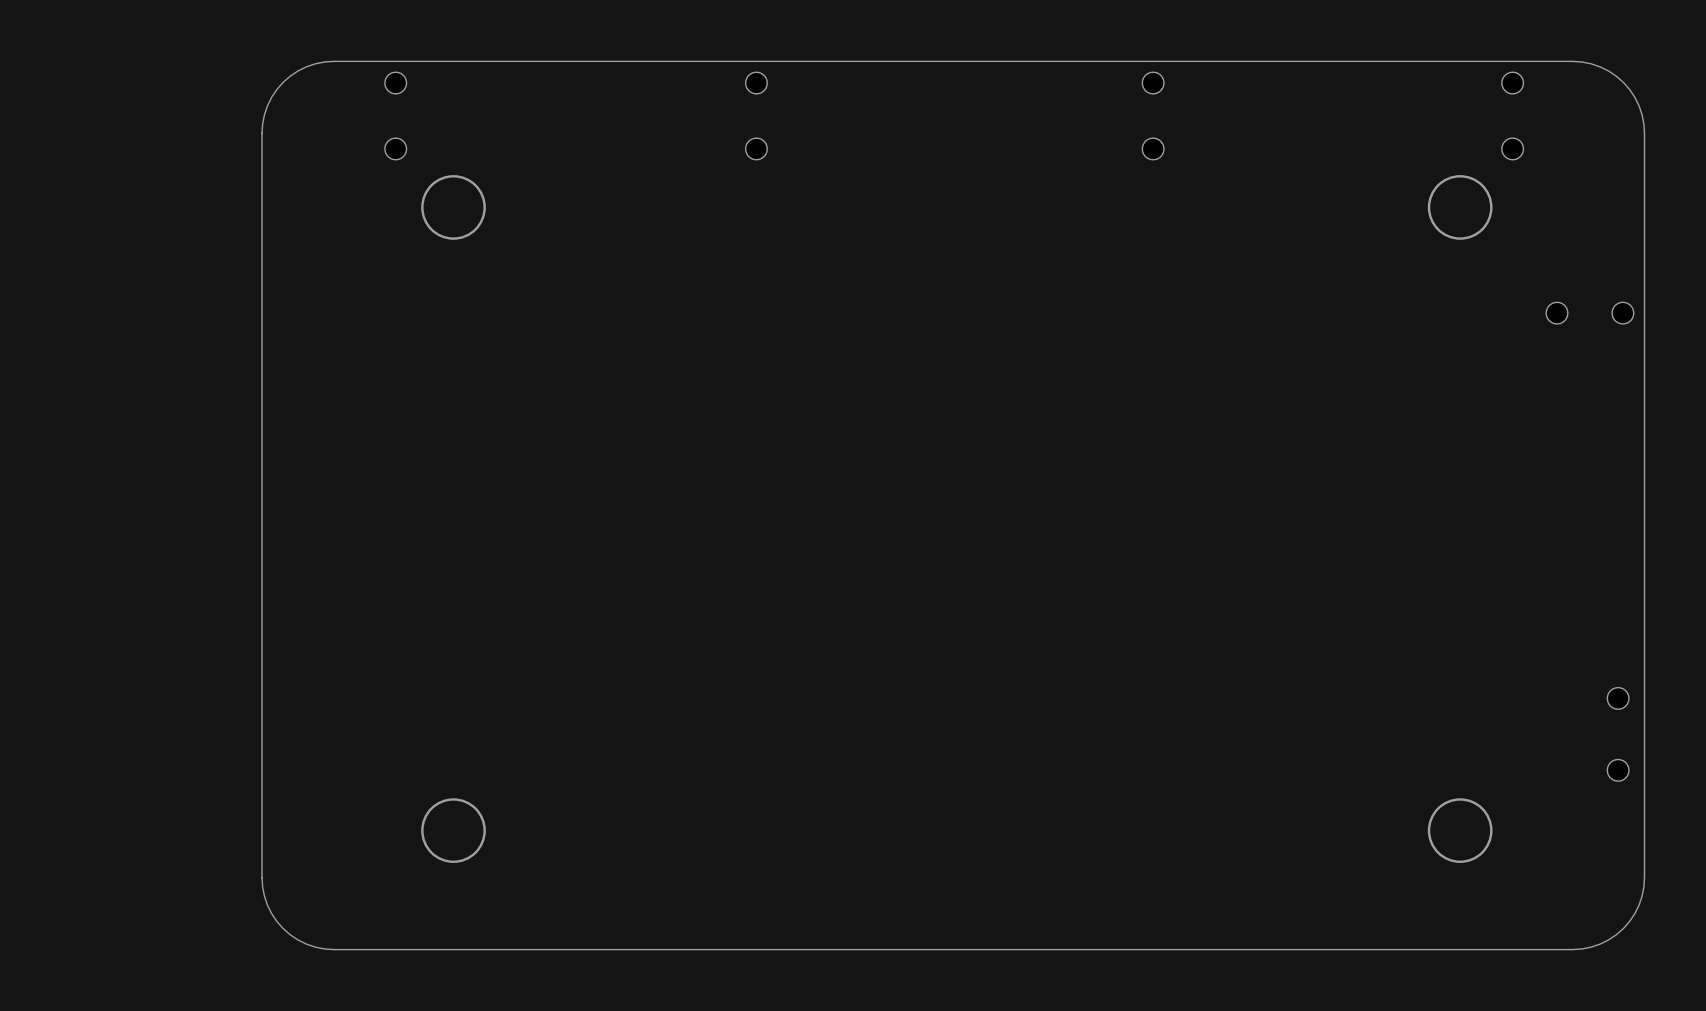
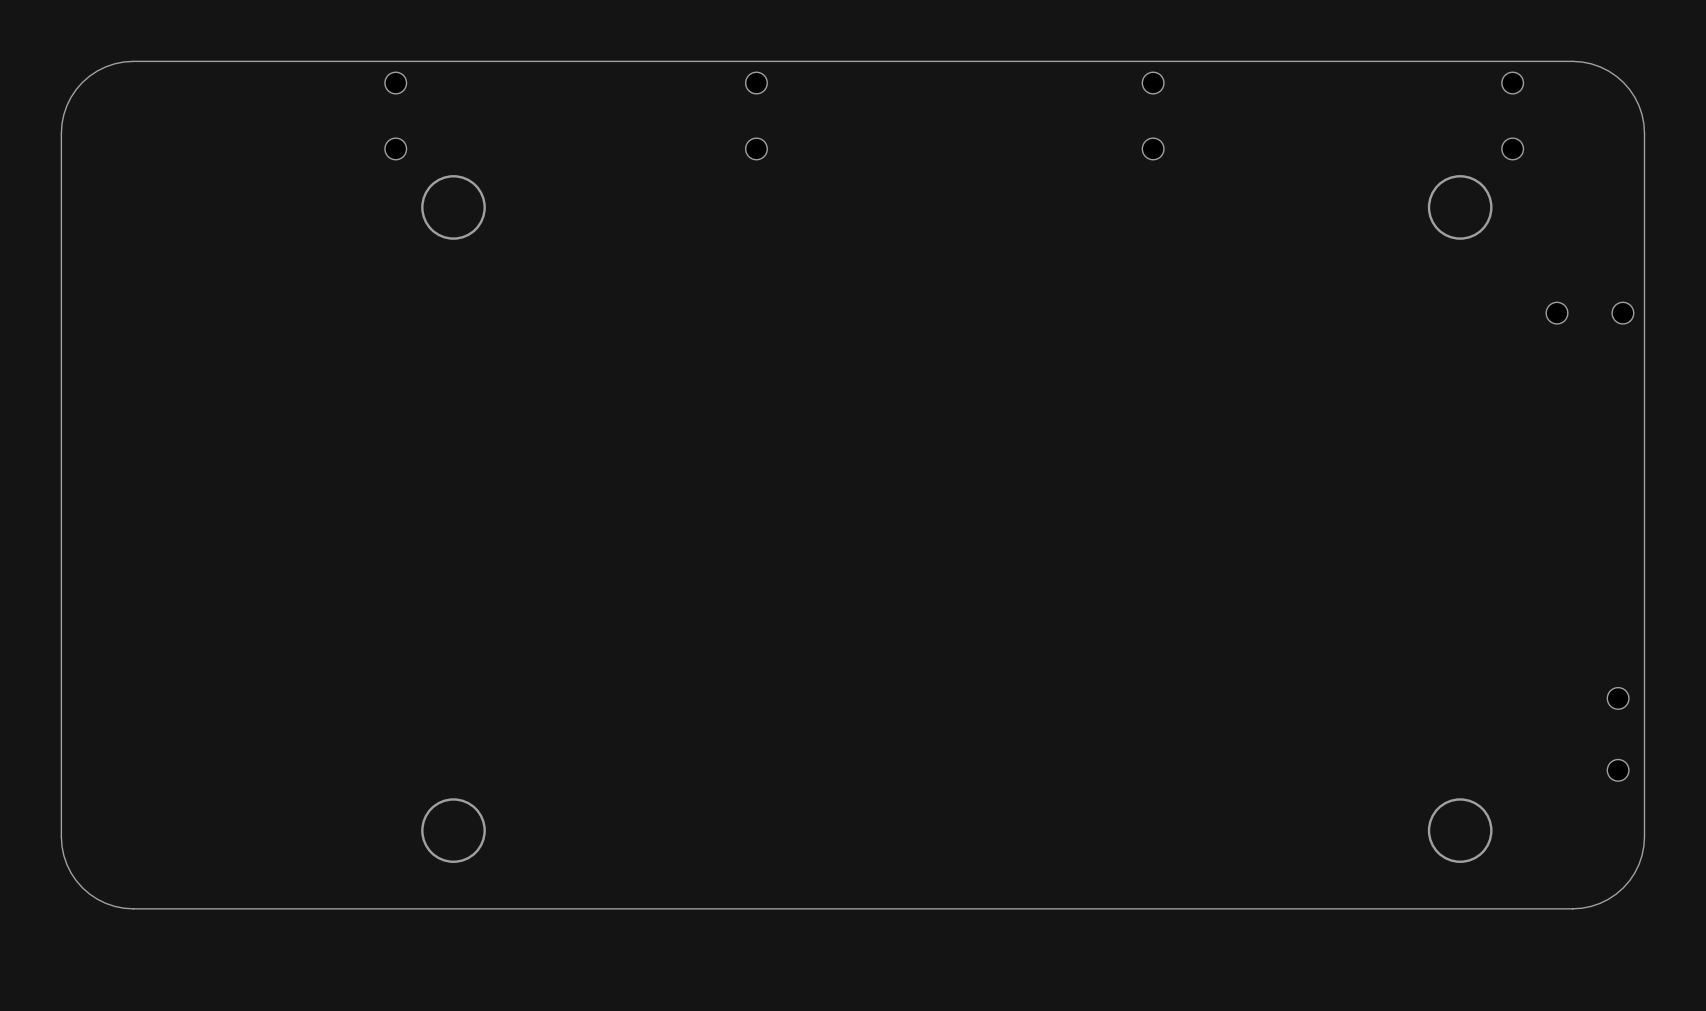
board edge: (333, 61) (306, 66) (283, 82) (267, 105) (262, 133) (262, 877) (264, 896) (271, 913) (283, 928) (297, 939) (315, 947) (333, 949) (1581, 948) (1600, 944) (1616, 934) (1634, 913) (1643, 887) (1644, 836) -> (133, 908) (1572, 908) (1600, 903) (1623, 887) (1639, 864) (1644, 836)
board edge: none -> (333, 61) (123, 61) (97, 71) (82, 82) (71, 97) (63, 114) (61, 133) (61, 846) (71, 872) (89, 893) (114, 906) (133, 908)

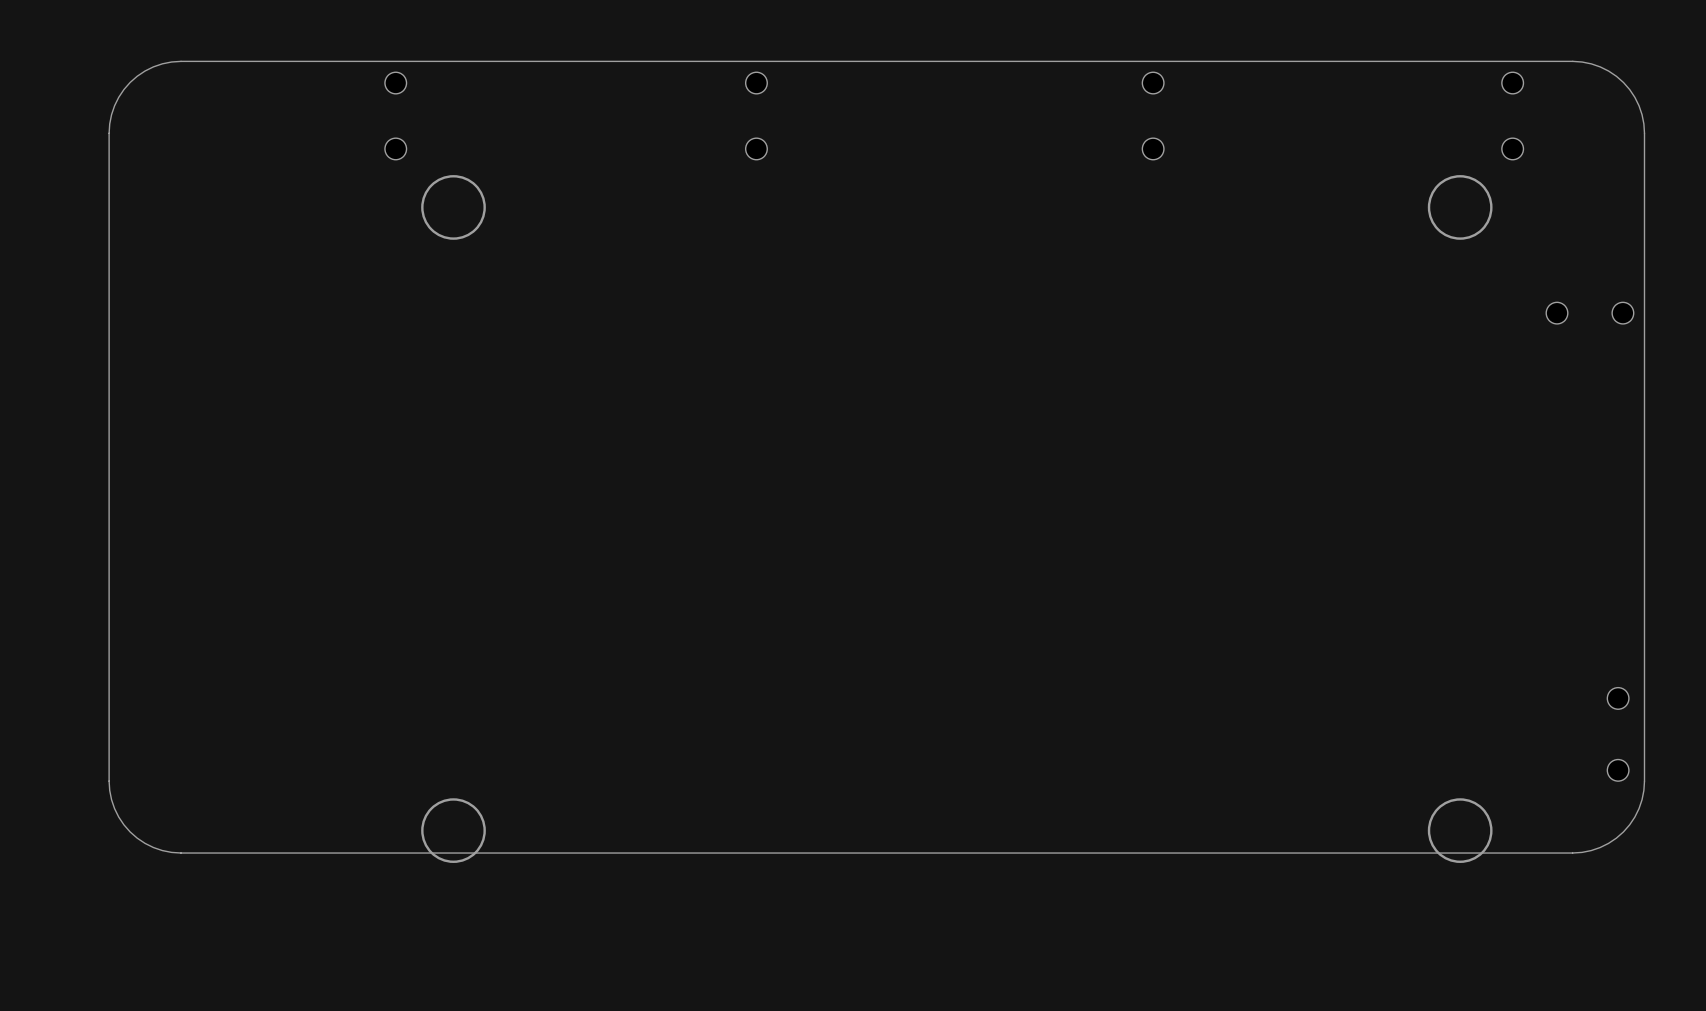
board edge: (181, 61) (123, 61) (97, 71) (82, 82) (71, 97) (63, 114) (61, 133) (61, 846) (71, 872) (89, 893) (114, 906) (133, 908) -> none
board edge: (1644, 781) (1643, 846) (1639, 864) (1629, 880) (1616, 893) (1600, 903) (1581, 908) (133, 908) -> (1644, 781) (1639, 808) (1623, 831) (1600, 847) (1572, 853) (181, 853) (153, 847) (137, 838) (118, 817) (111, 799) (109, 781) (109, 133) (114, 105) (130, 82) (153, 66) (181, 61)

